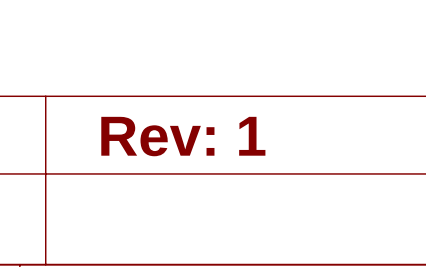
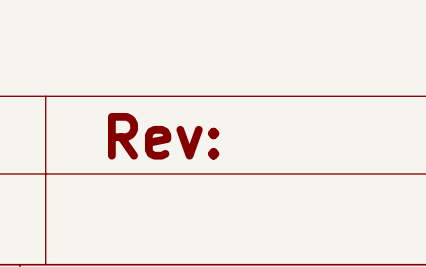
title block: Rev: 1 (183, 136) -> Rev: (163, 136)

